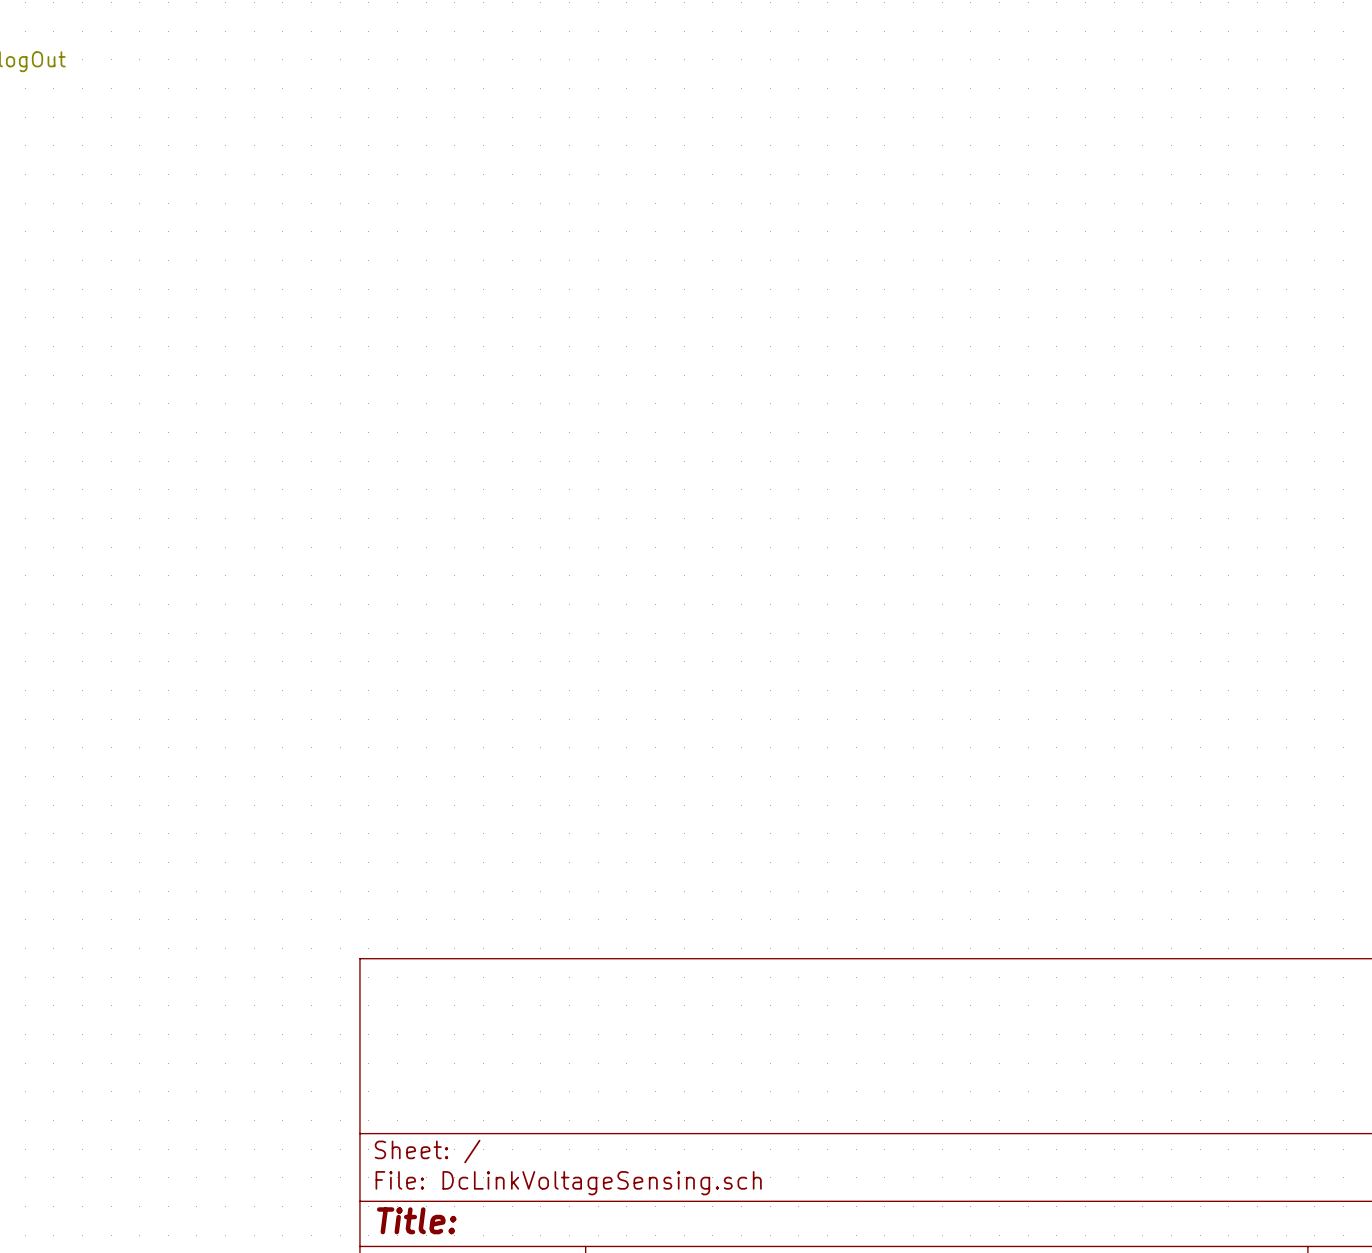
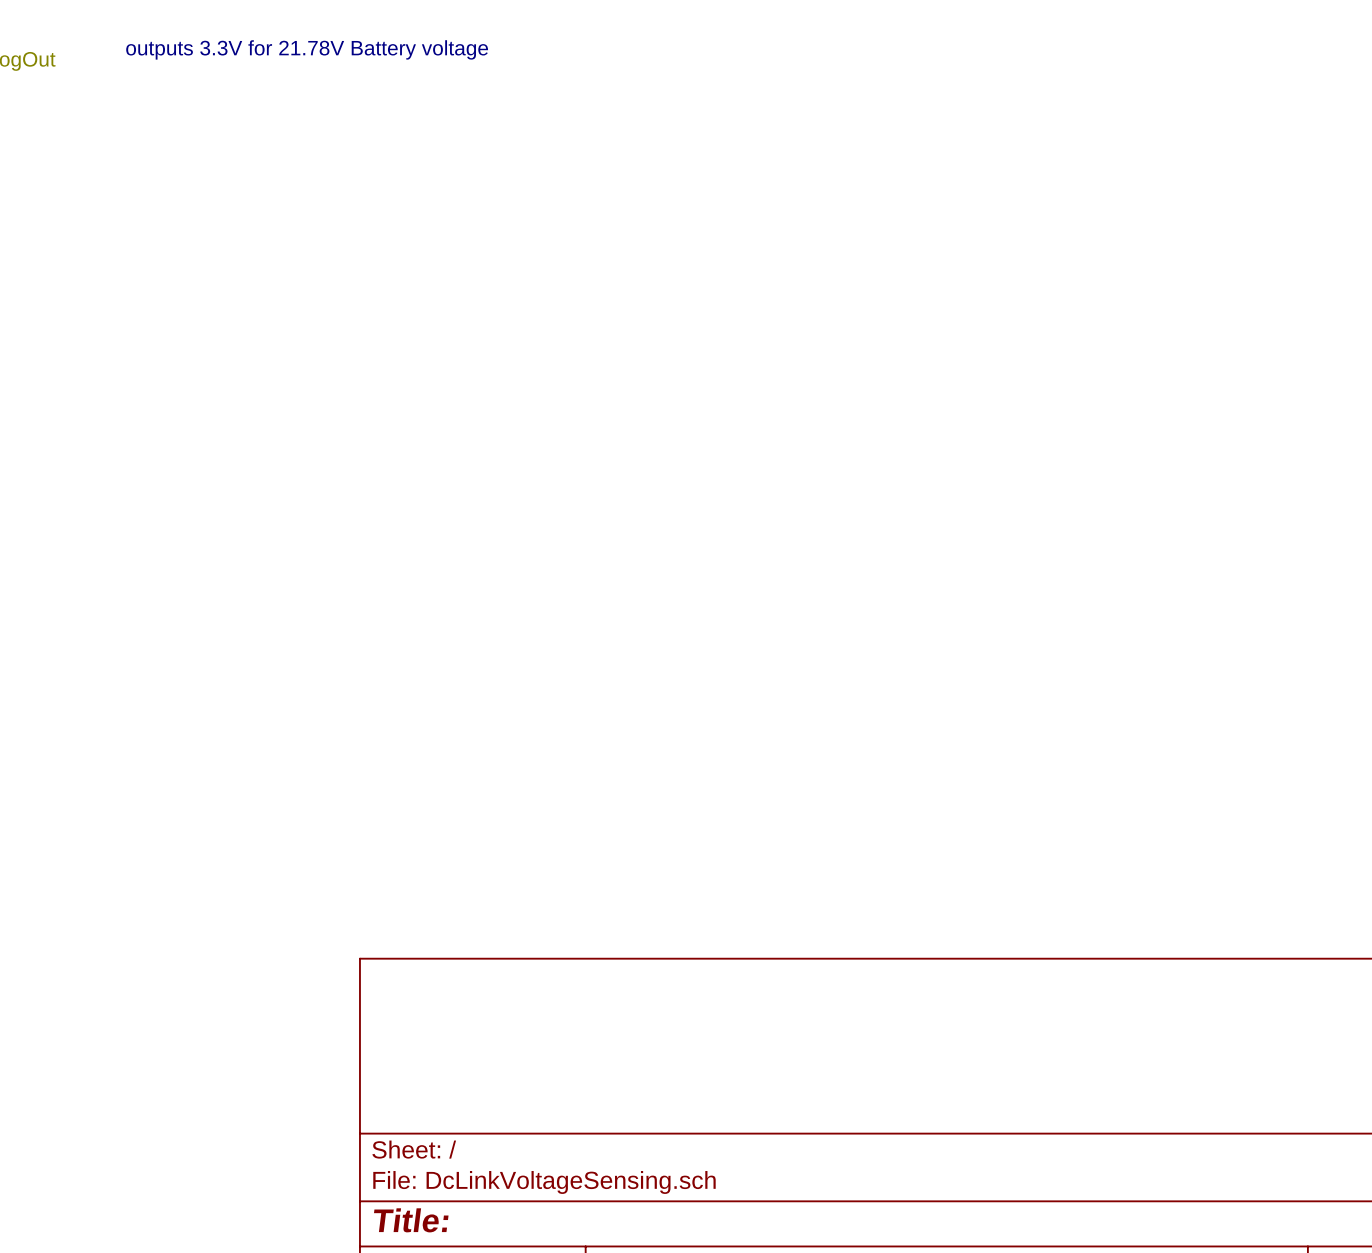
text: none -> outputs 3.3V for 21.78V Battery voltage (307, 49)

